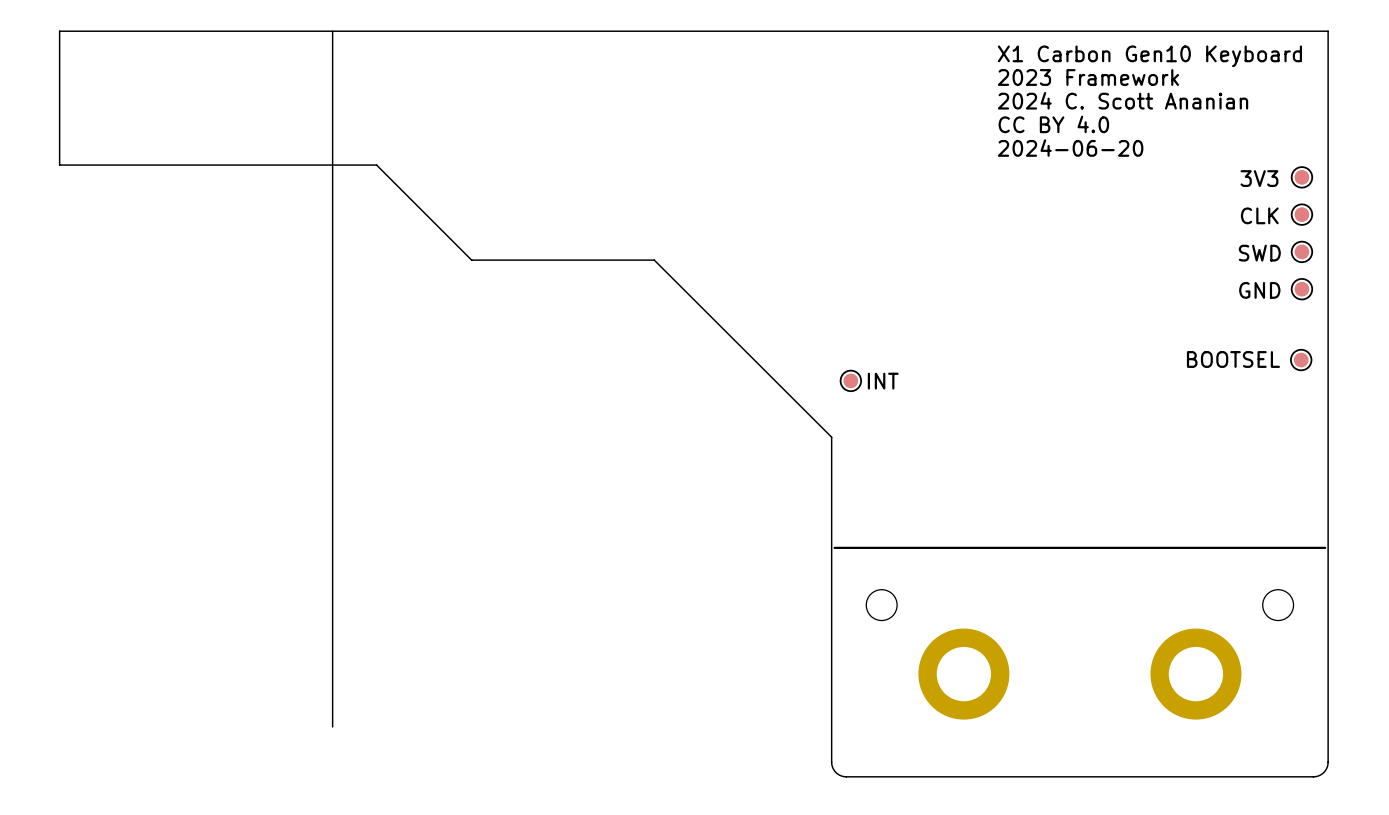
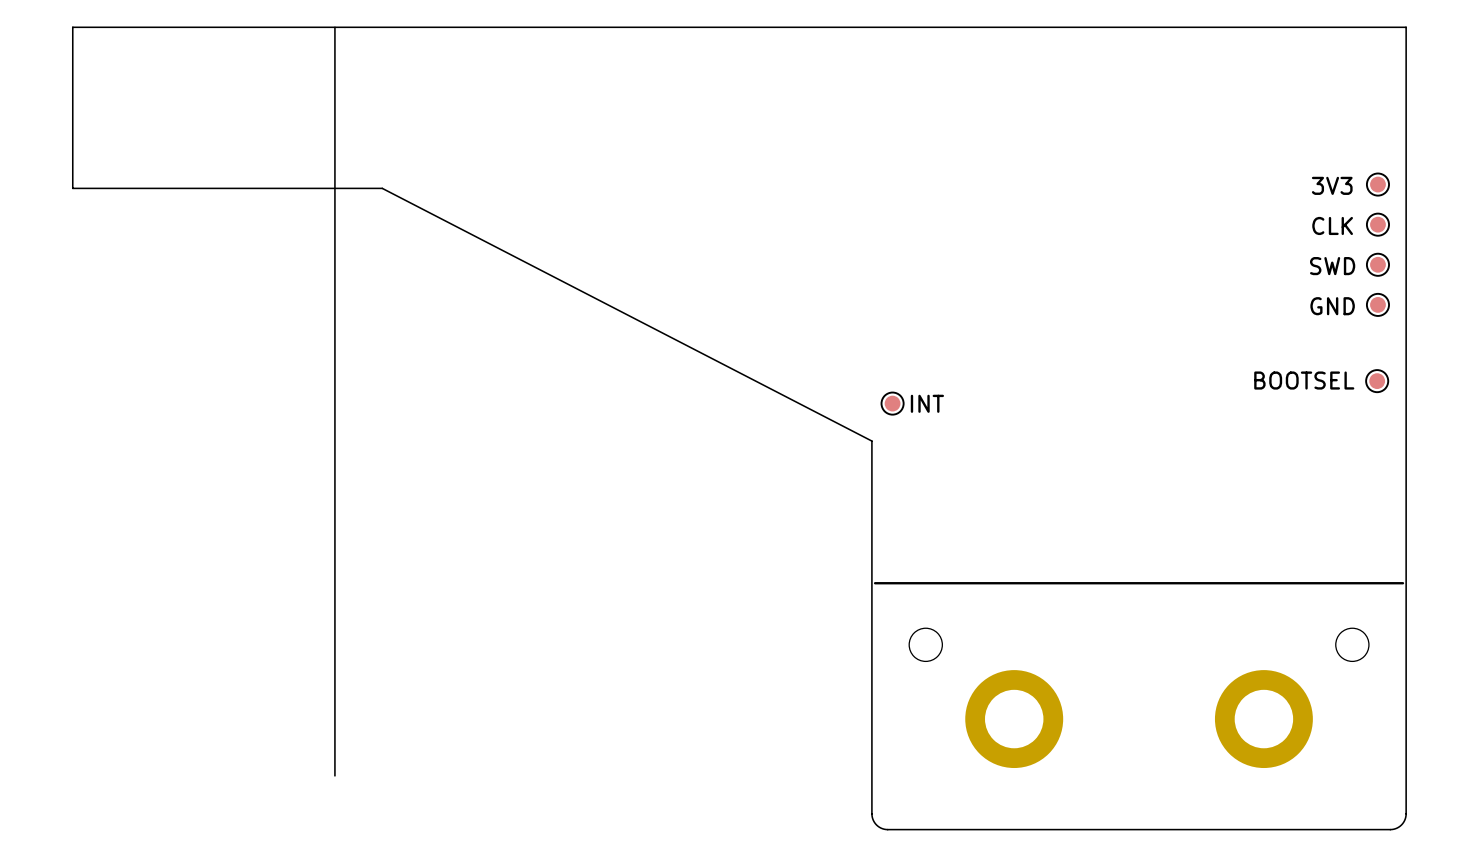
board edge: (88, 31) (59, 31) (59, 165) (376, 165) (471, 260) (654, 260) (831, 437) -> (72, 27) (72, 188) (382, 188) (871, 441) (871, 464)
text: X1 Carbon Gen10 Keyboard (1149, 56) -> none
text: 2023 Framework (1088, 77) -> none
text: 2024 C. Scott Ananian (1123, 100) -> none
text: CC BY 4.0 (1053, 124) -> none
text: 2024-06-20 (1070, 148) -> none

